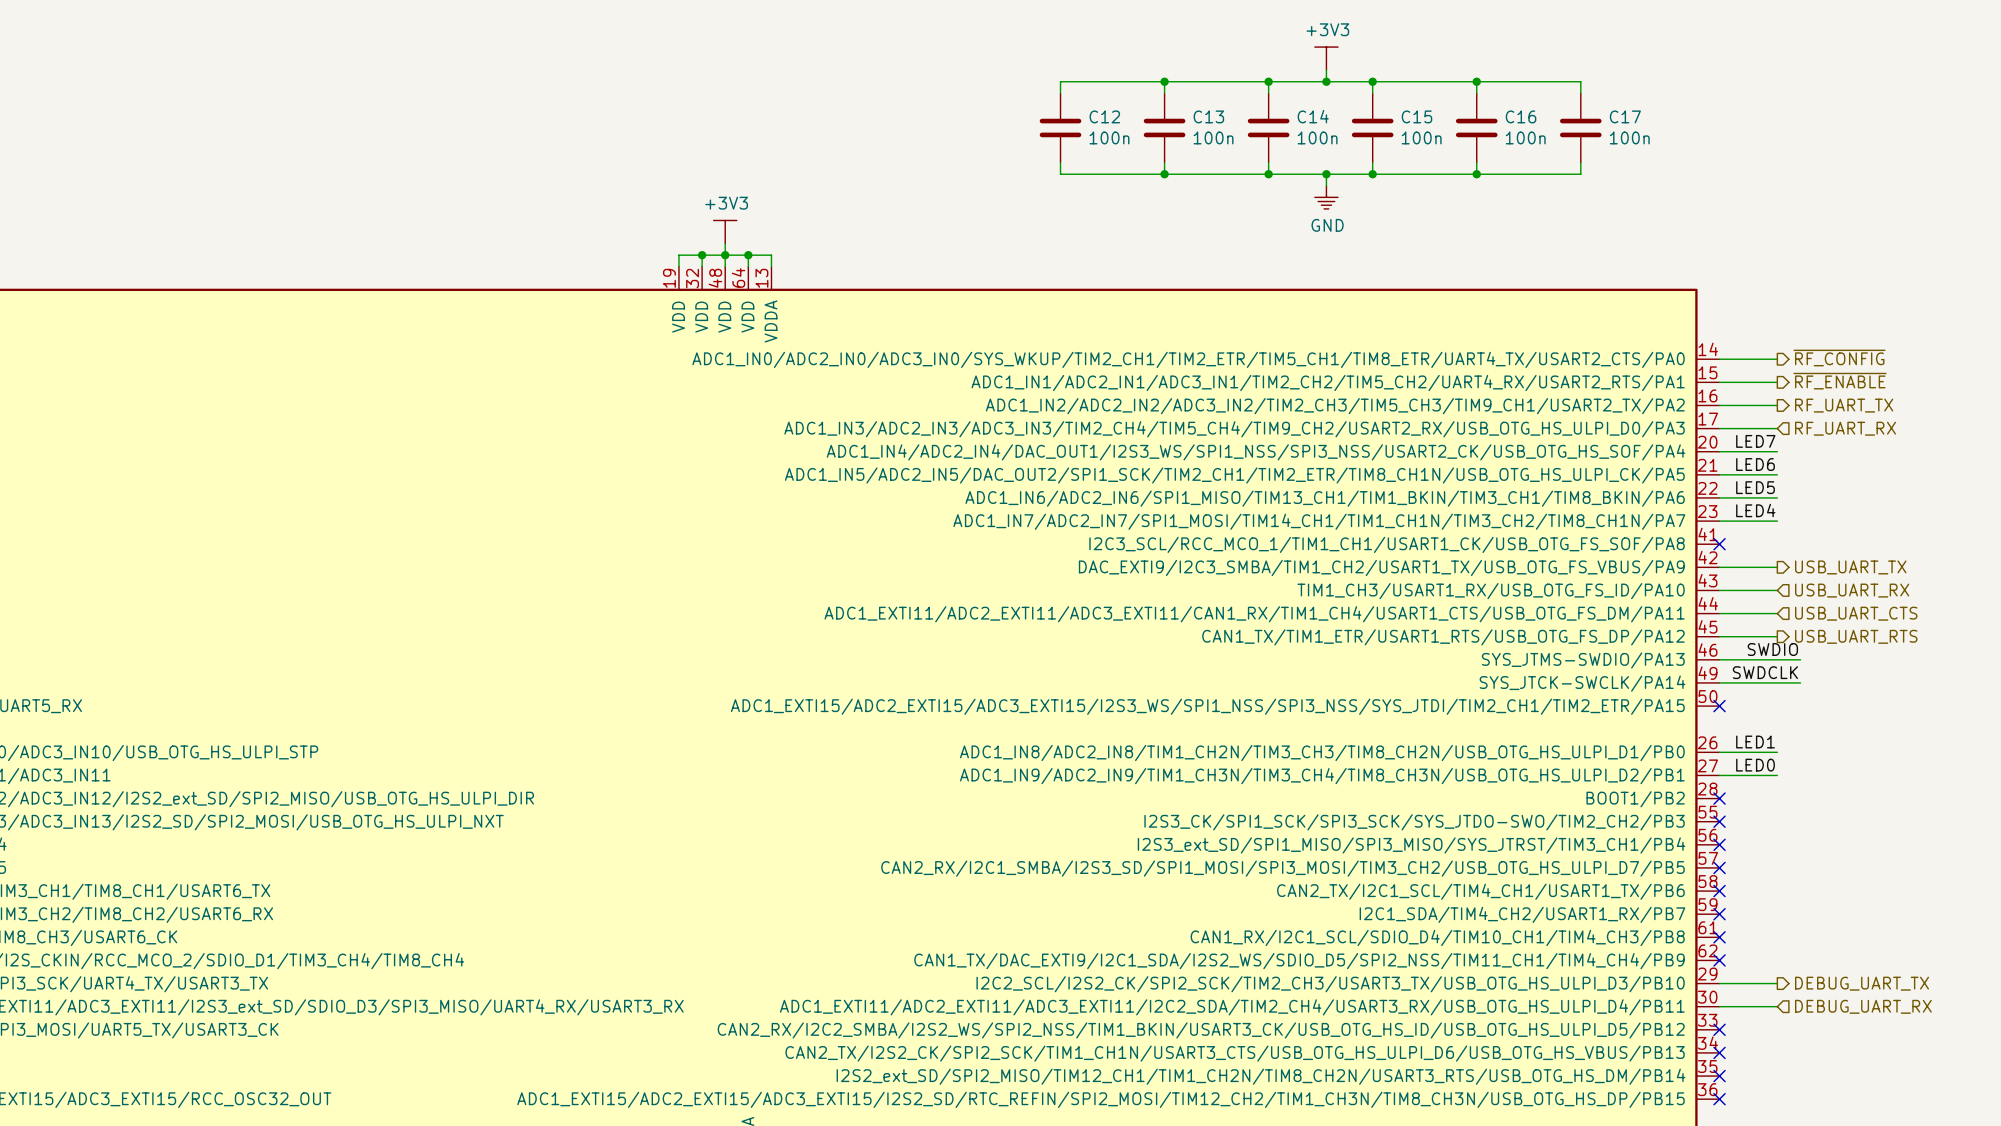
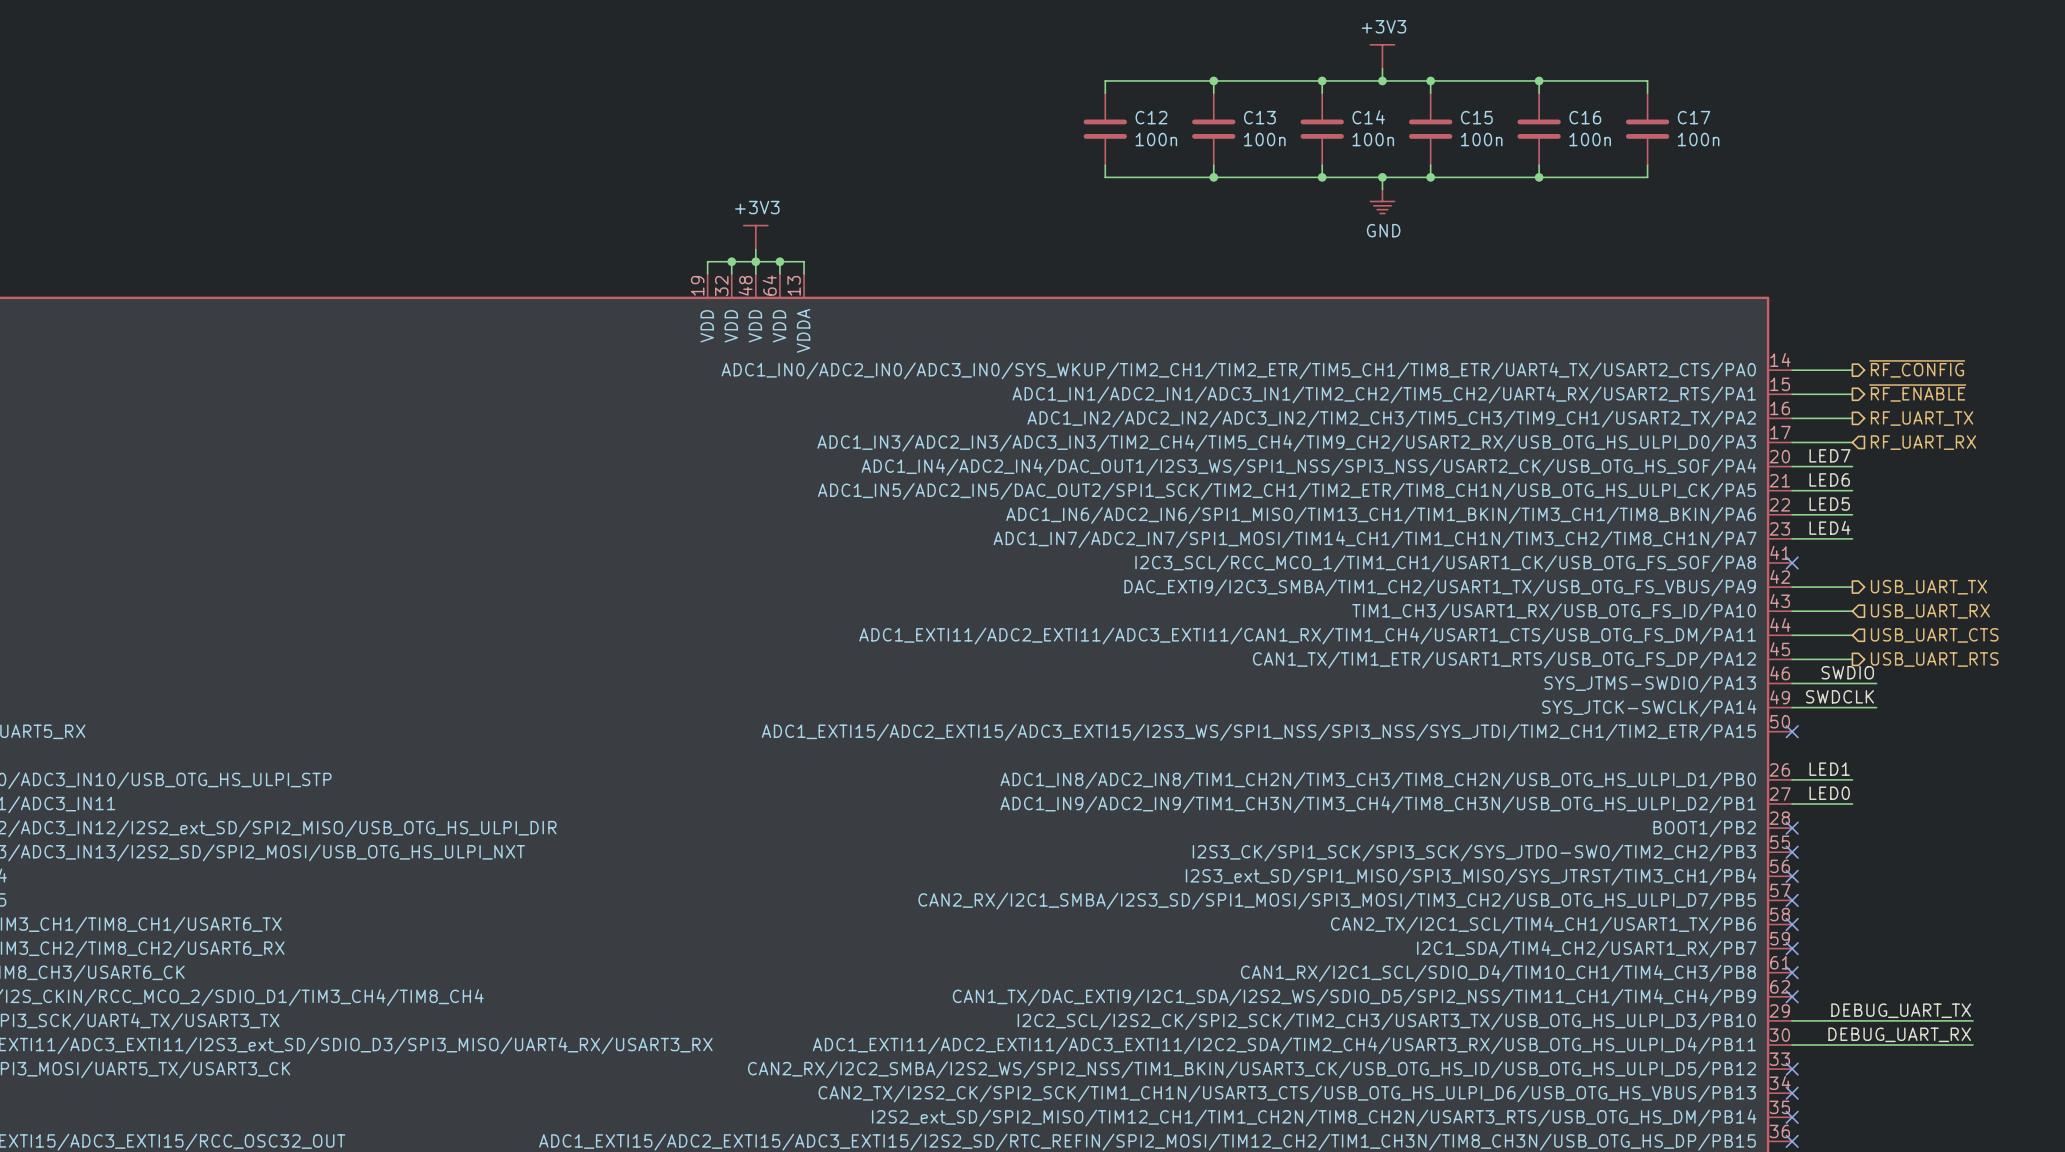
label: none -> DEBUG_UART_TX (1901, 1010)
wire: none -> (1852, 1020) (1972, 1020)
hierarchical label: DEBUG_UART_TX (1862, 983) -> none
label: none -> DEBUG_UART_RX (1899, 1034)
wire: none -> (1852, 1045) (1972, 1045)
hierarchical label: DEBUG_UART_RX (1863, 1006) -> none

